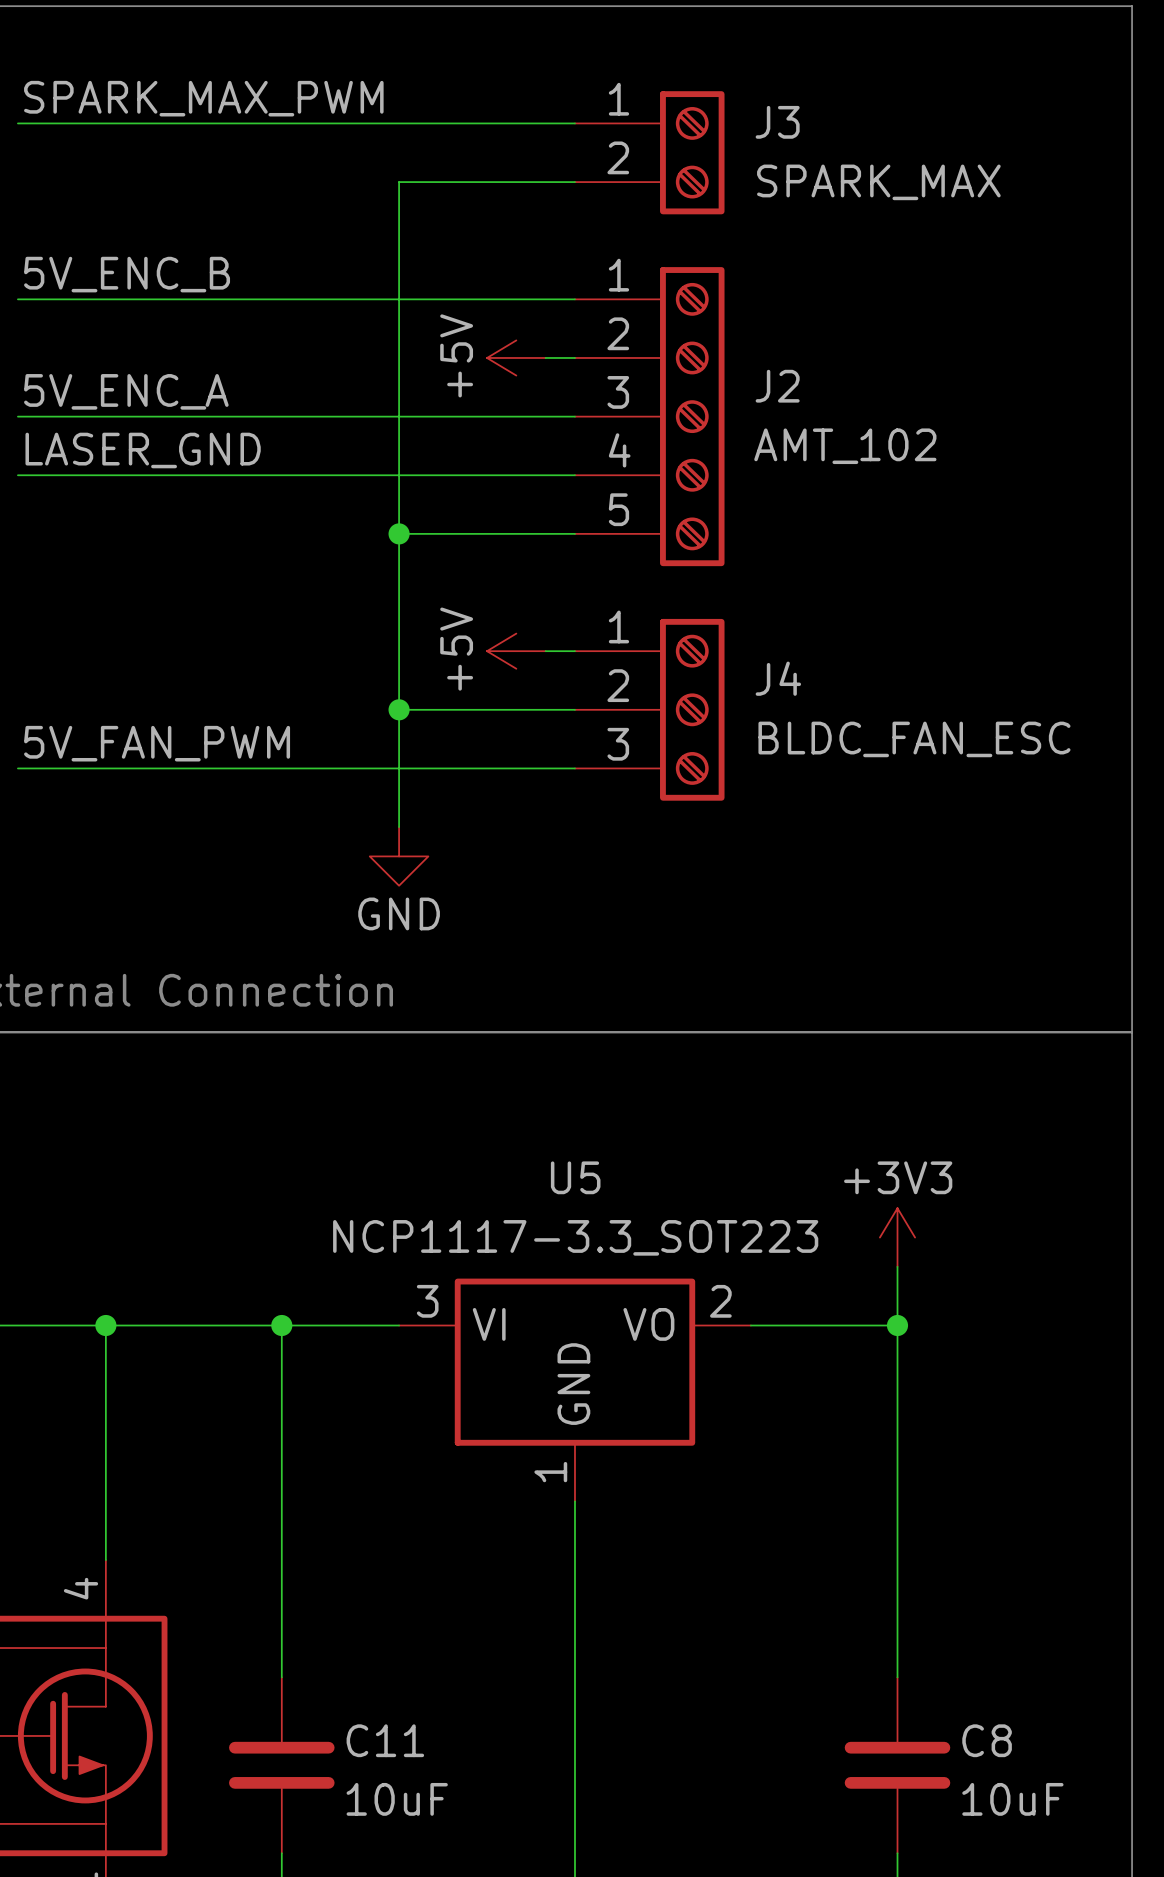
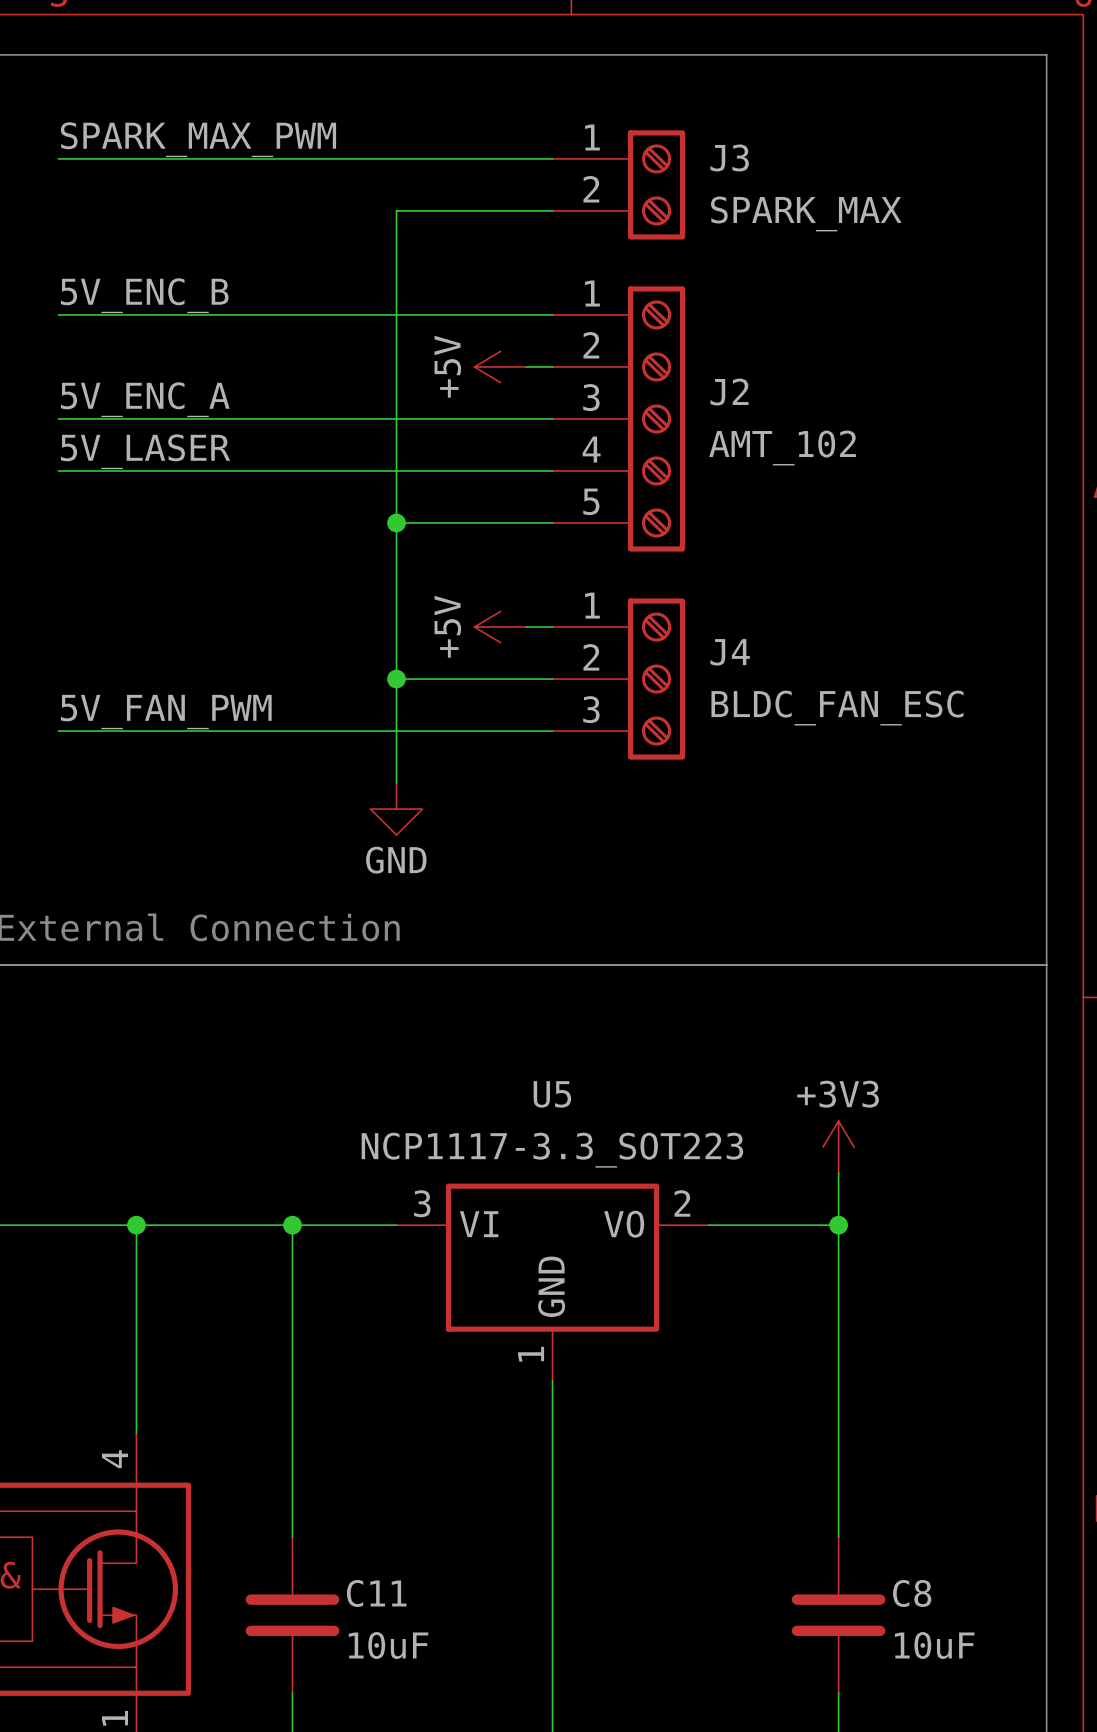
label: LASER_GND (143, 450) -> 5V_LASER (145, 451)

